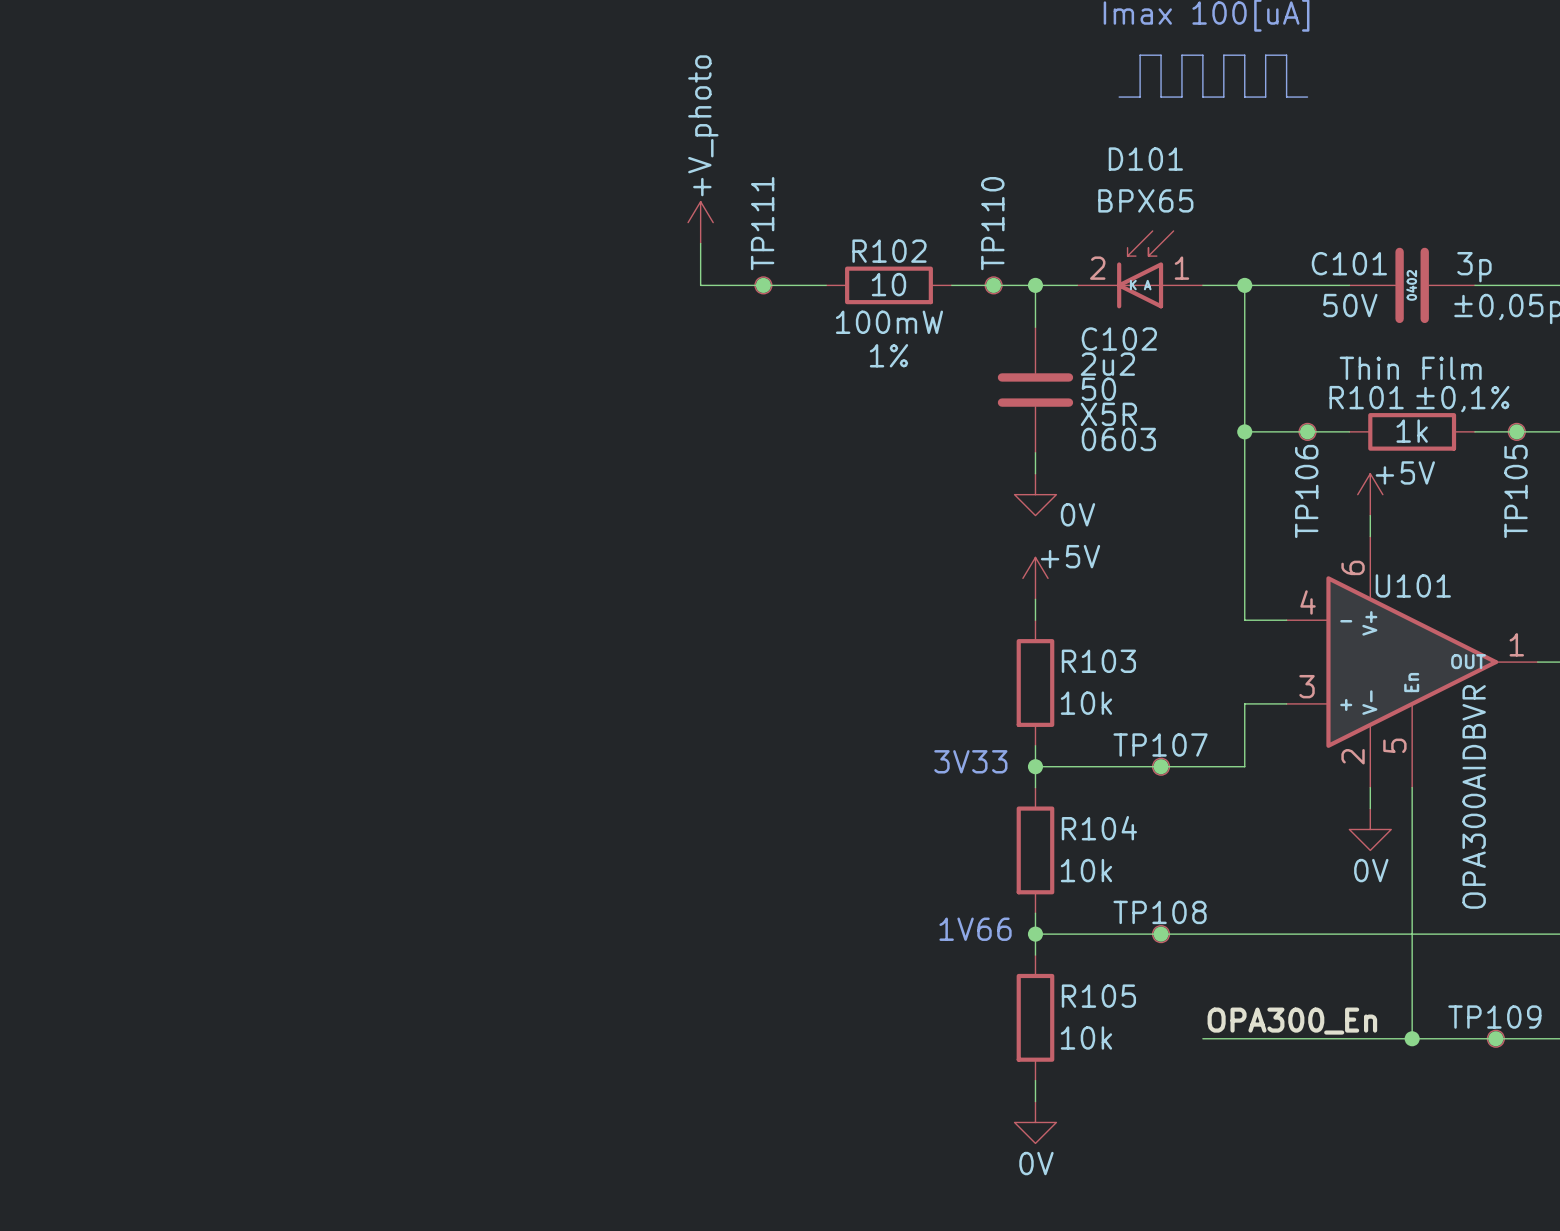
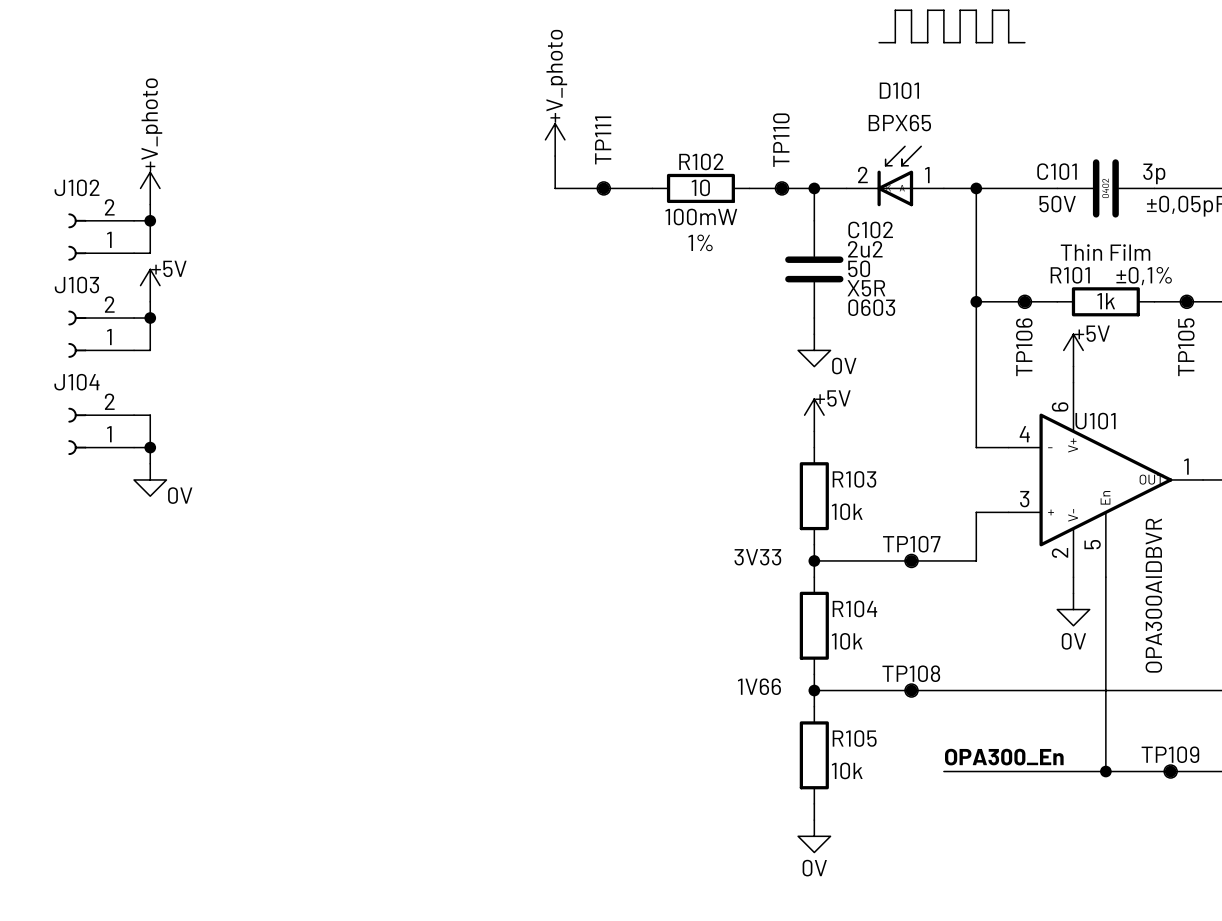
power symbol: none -> +V_photo (150, 188)
wire: none -> (150, 204) (150, 253) (134, 253)
wire: none -> (134, 220) (150, 220)
junction: none -> (150, 220)
J102: none -> (101, 237)
power symbol: none -> +5V (150, 285)
wire: none -> (150, 301) (150, 350) (134, 350)
wire: none -> (134, 318) (150, 318)
junction: none -> (150, 318)
J103: none -> (101, 334)
wire: none -> (134, 415) (150, 415) (150, 463)
J104: none -> (101, 431)
wire: none -> (134, 447) (150, 447)
junction: none -> (150, 447)
power symbol: none -> 0V (150, 479)

